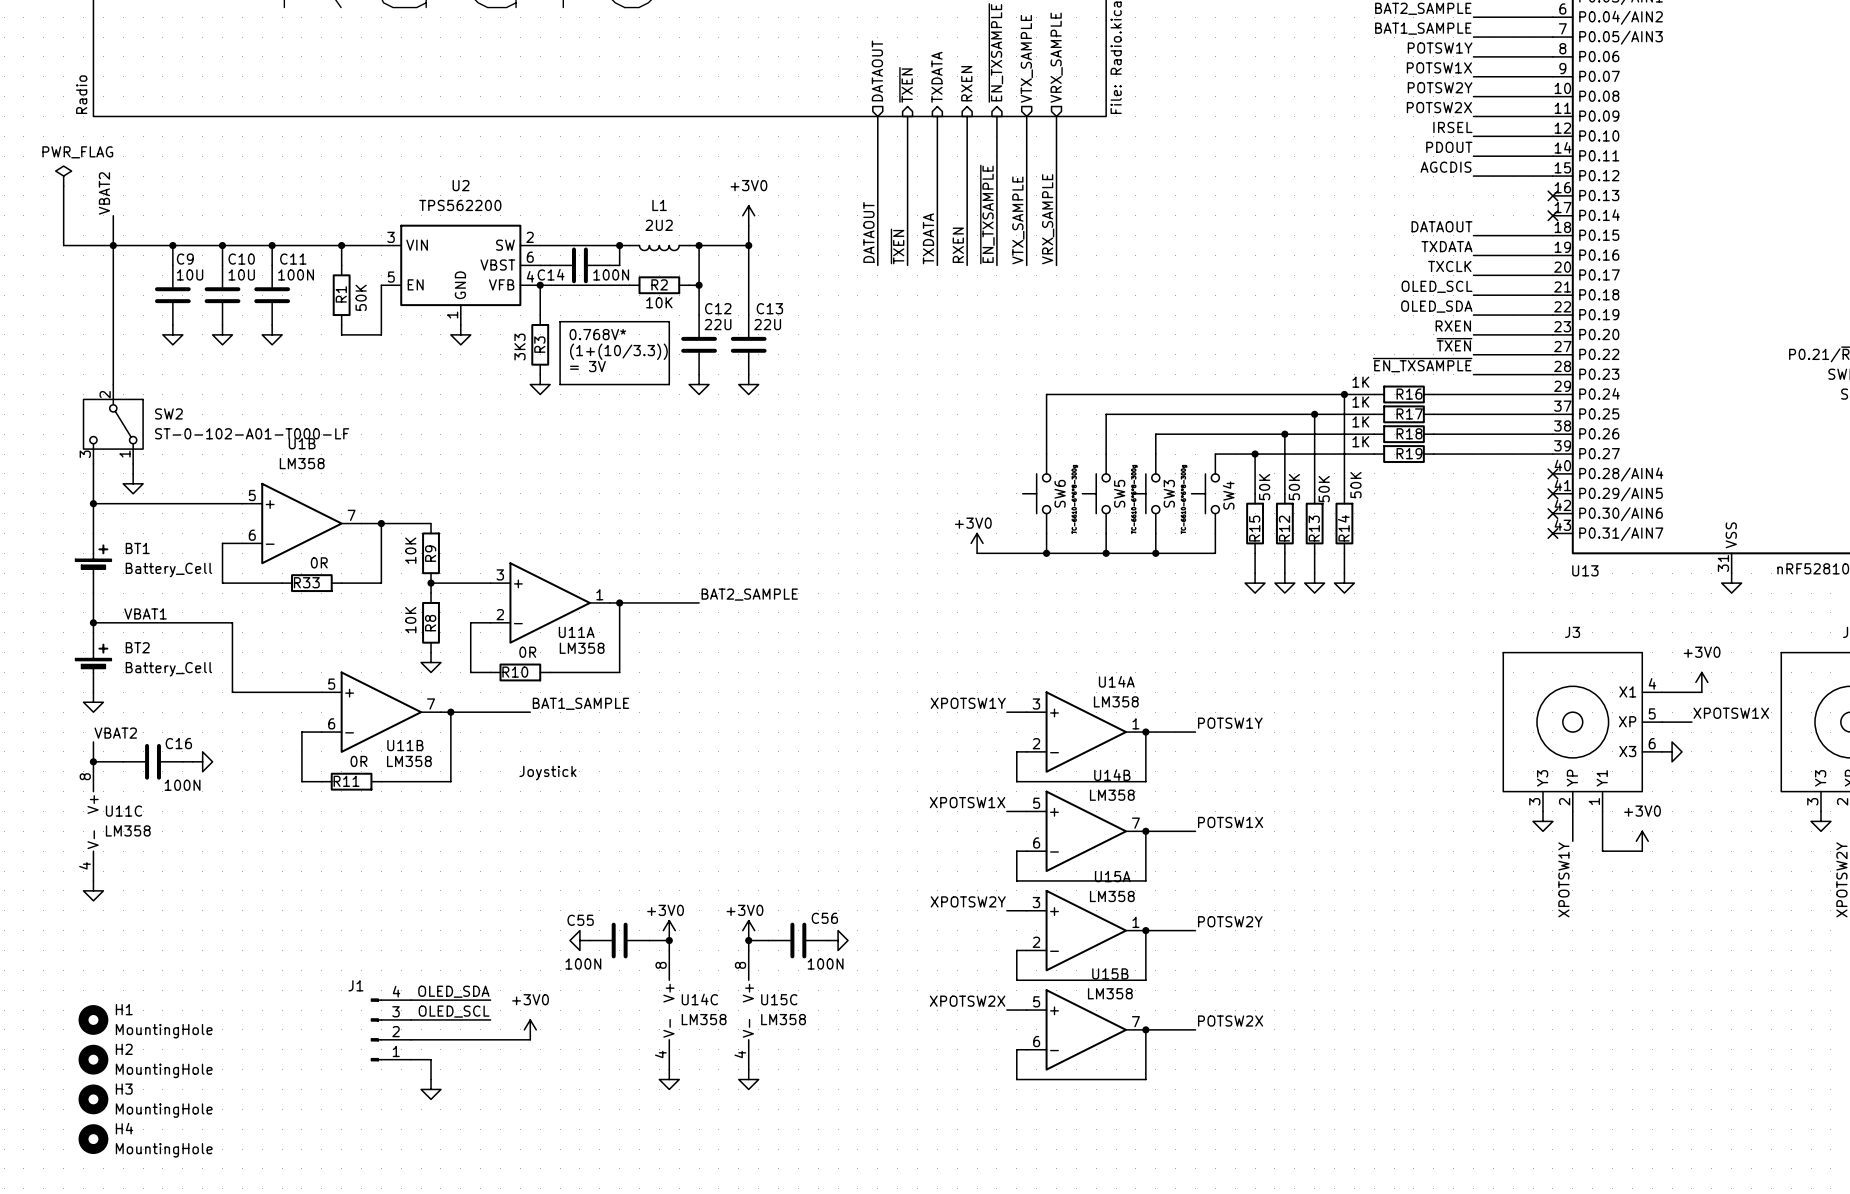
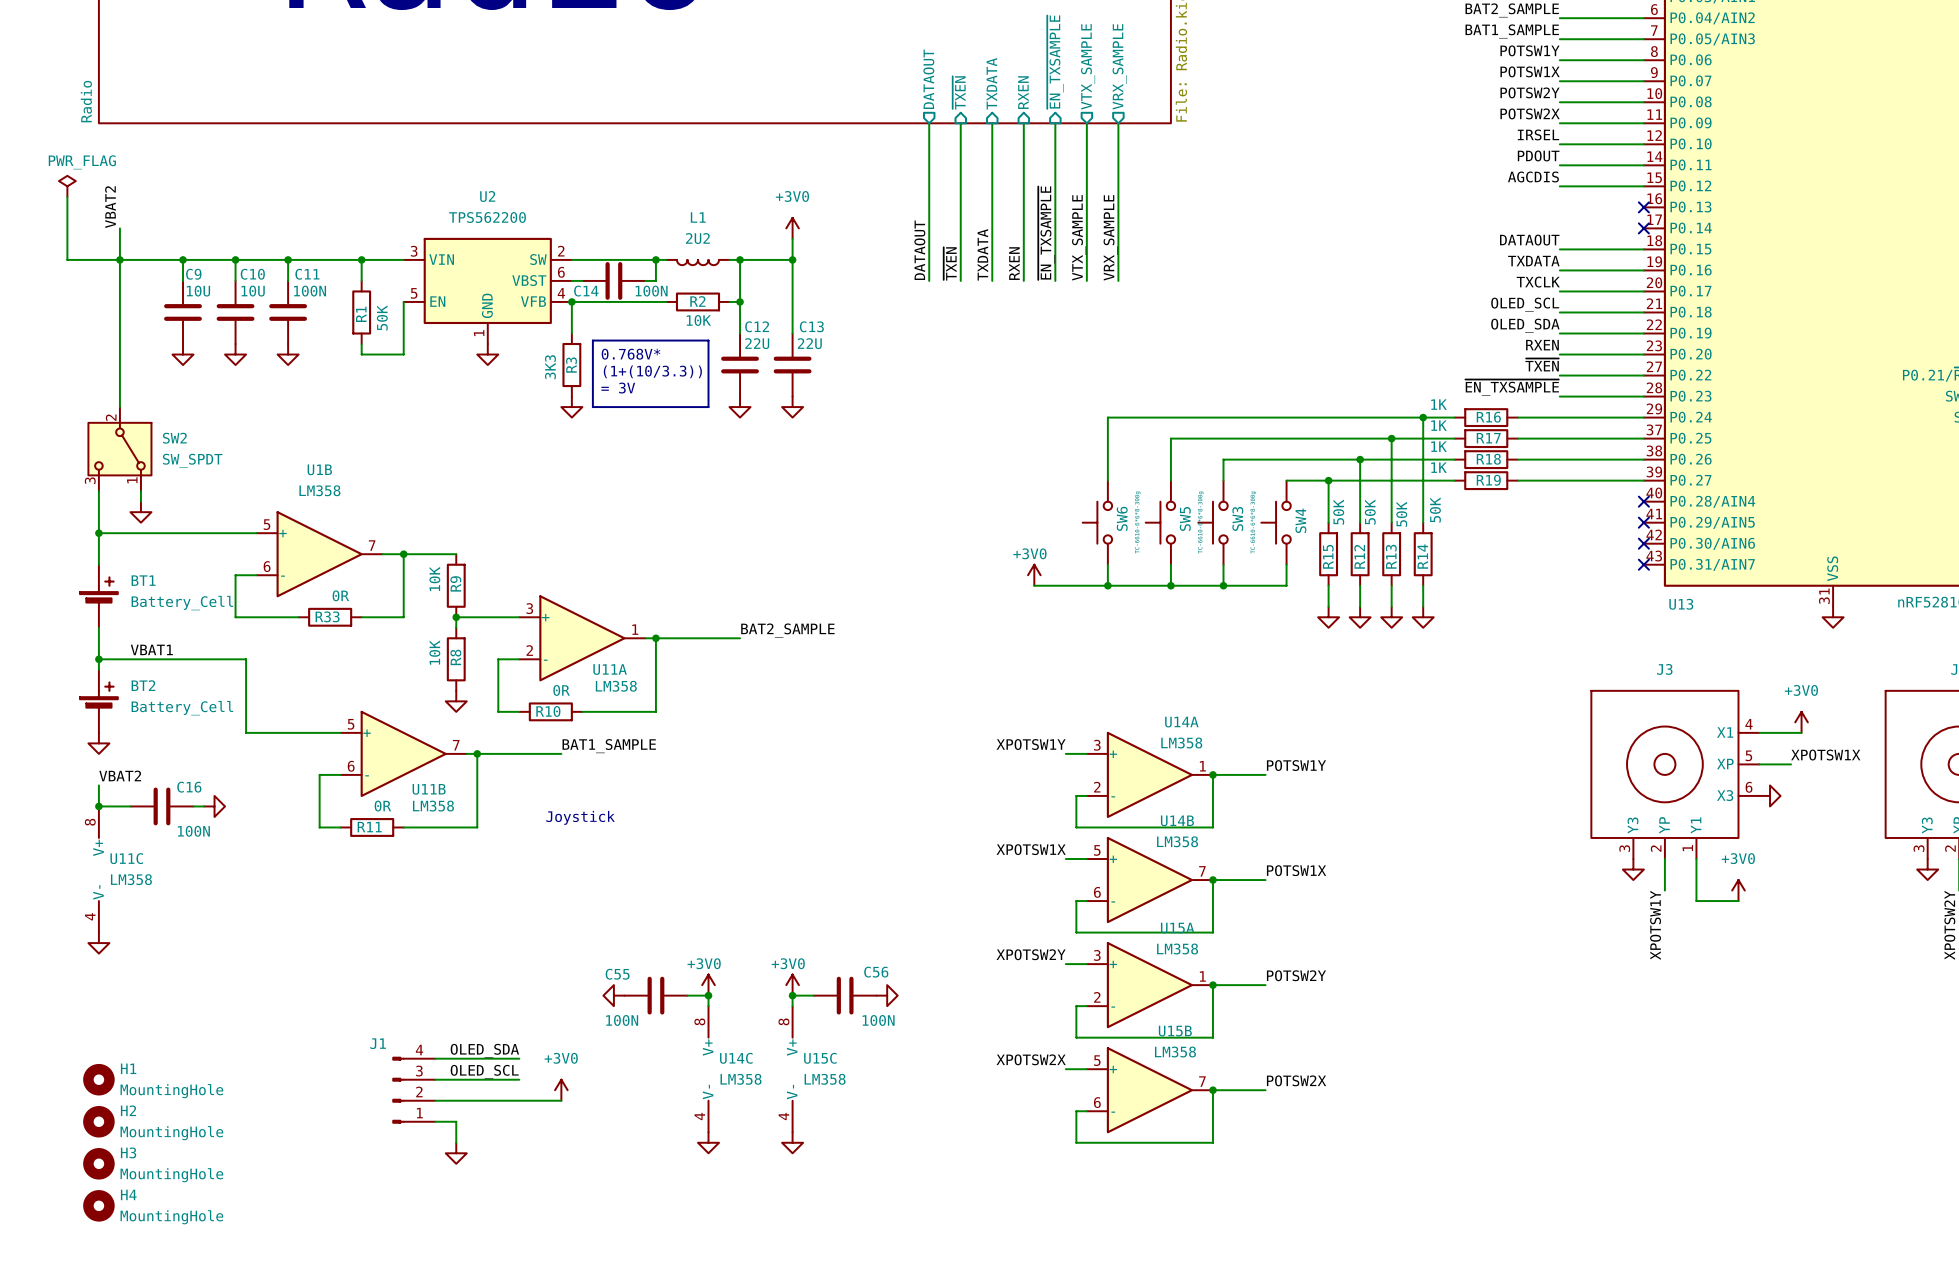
SW2 value: ST-0-102-A01-T000-LF (252, 433) -> SW_SPDT (192, 460)

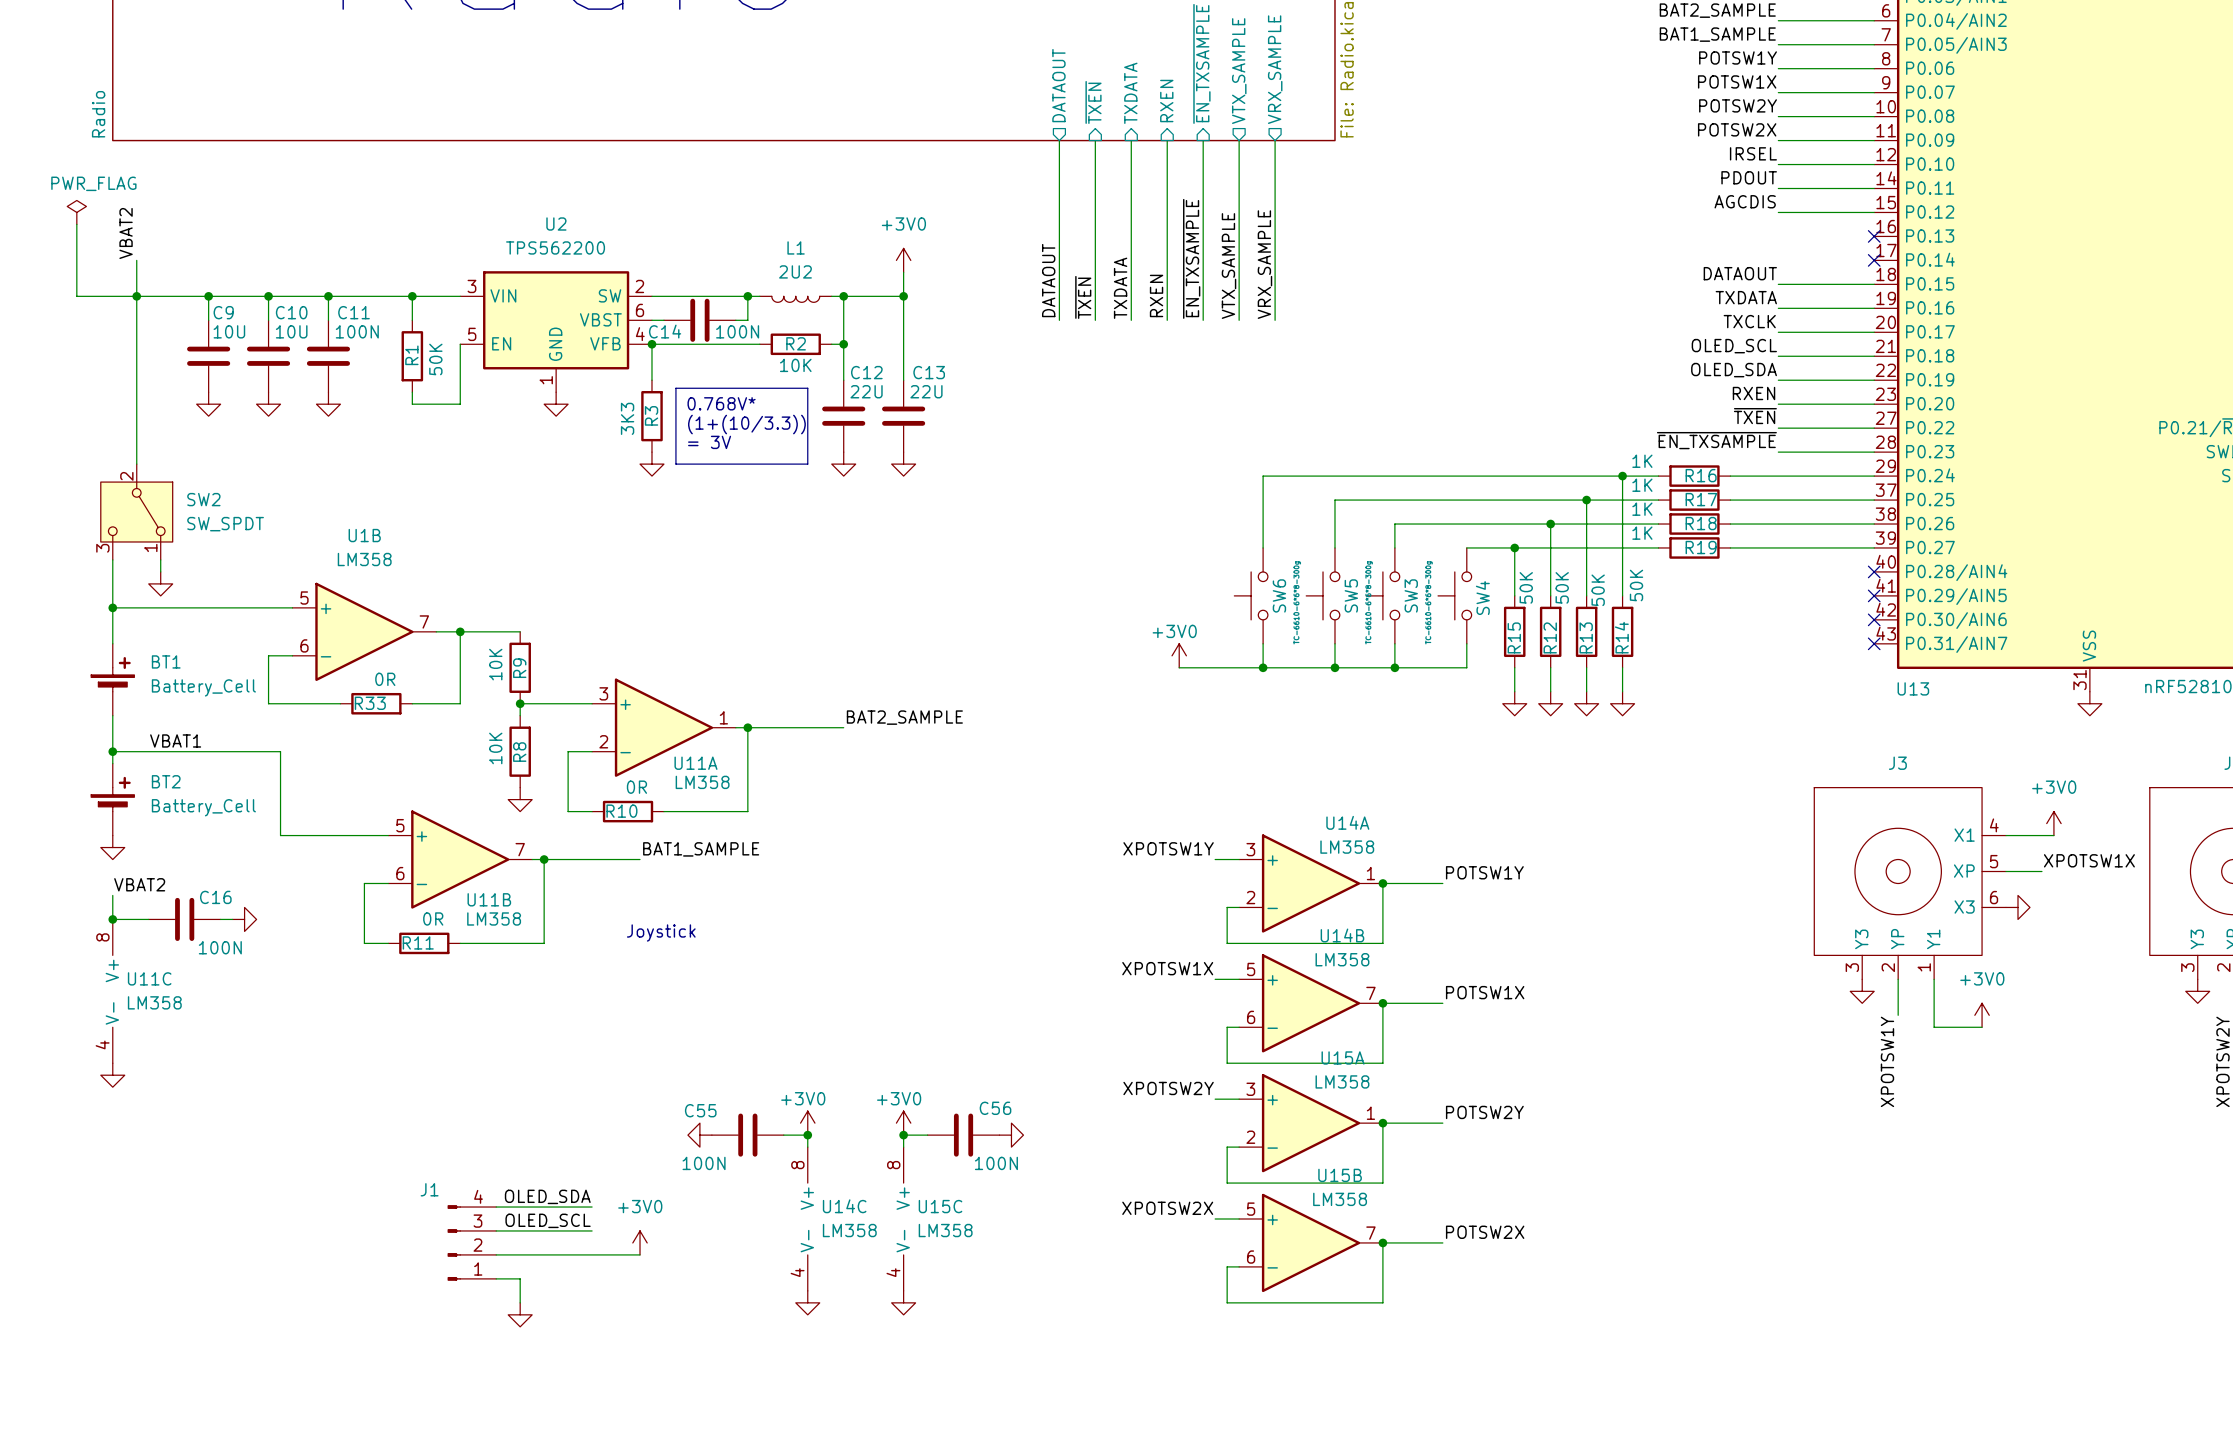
H1: MountingHole (98, 1079) -> none
H2: MountingHole (98, 1121) -> none
H3: MountingHole (98, 1163) -> none
H4: MountingHole (98, 1205) -> none

